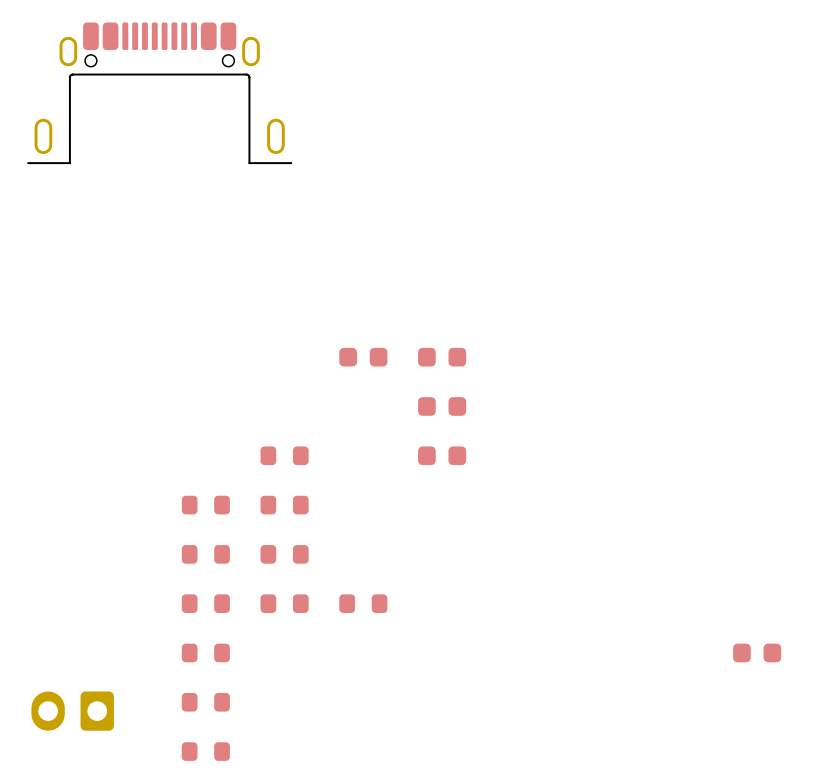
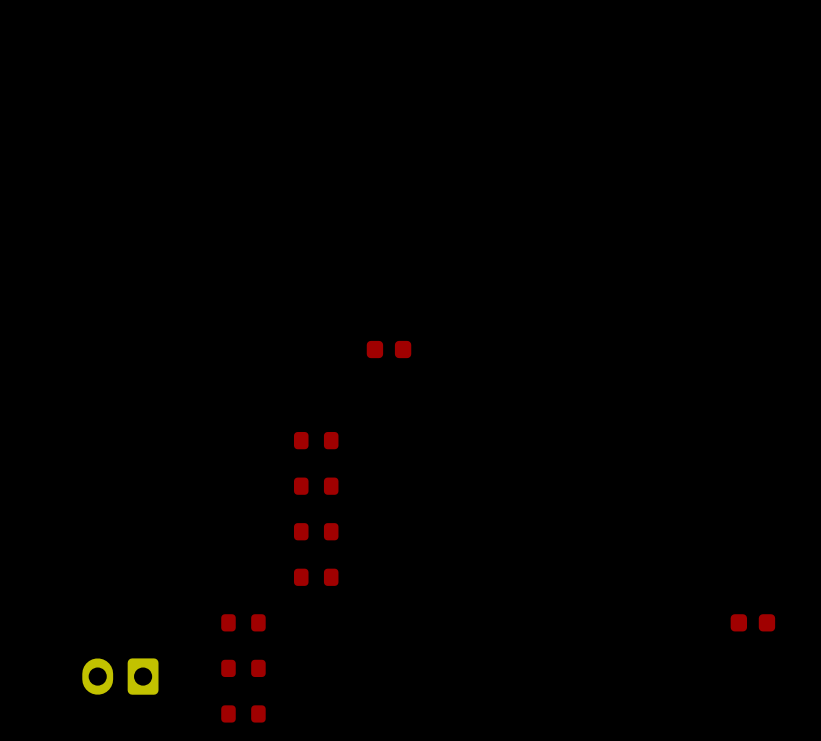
part: (159, 93) -> none
part: (442, 357) -> none
part: (442, 406) -> none
part: (442, 455) -> none
part: (205, 505) -> none
part: (205, 554) -> none
part: (205, 603) -> none
part: (363, 603) -> none

